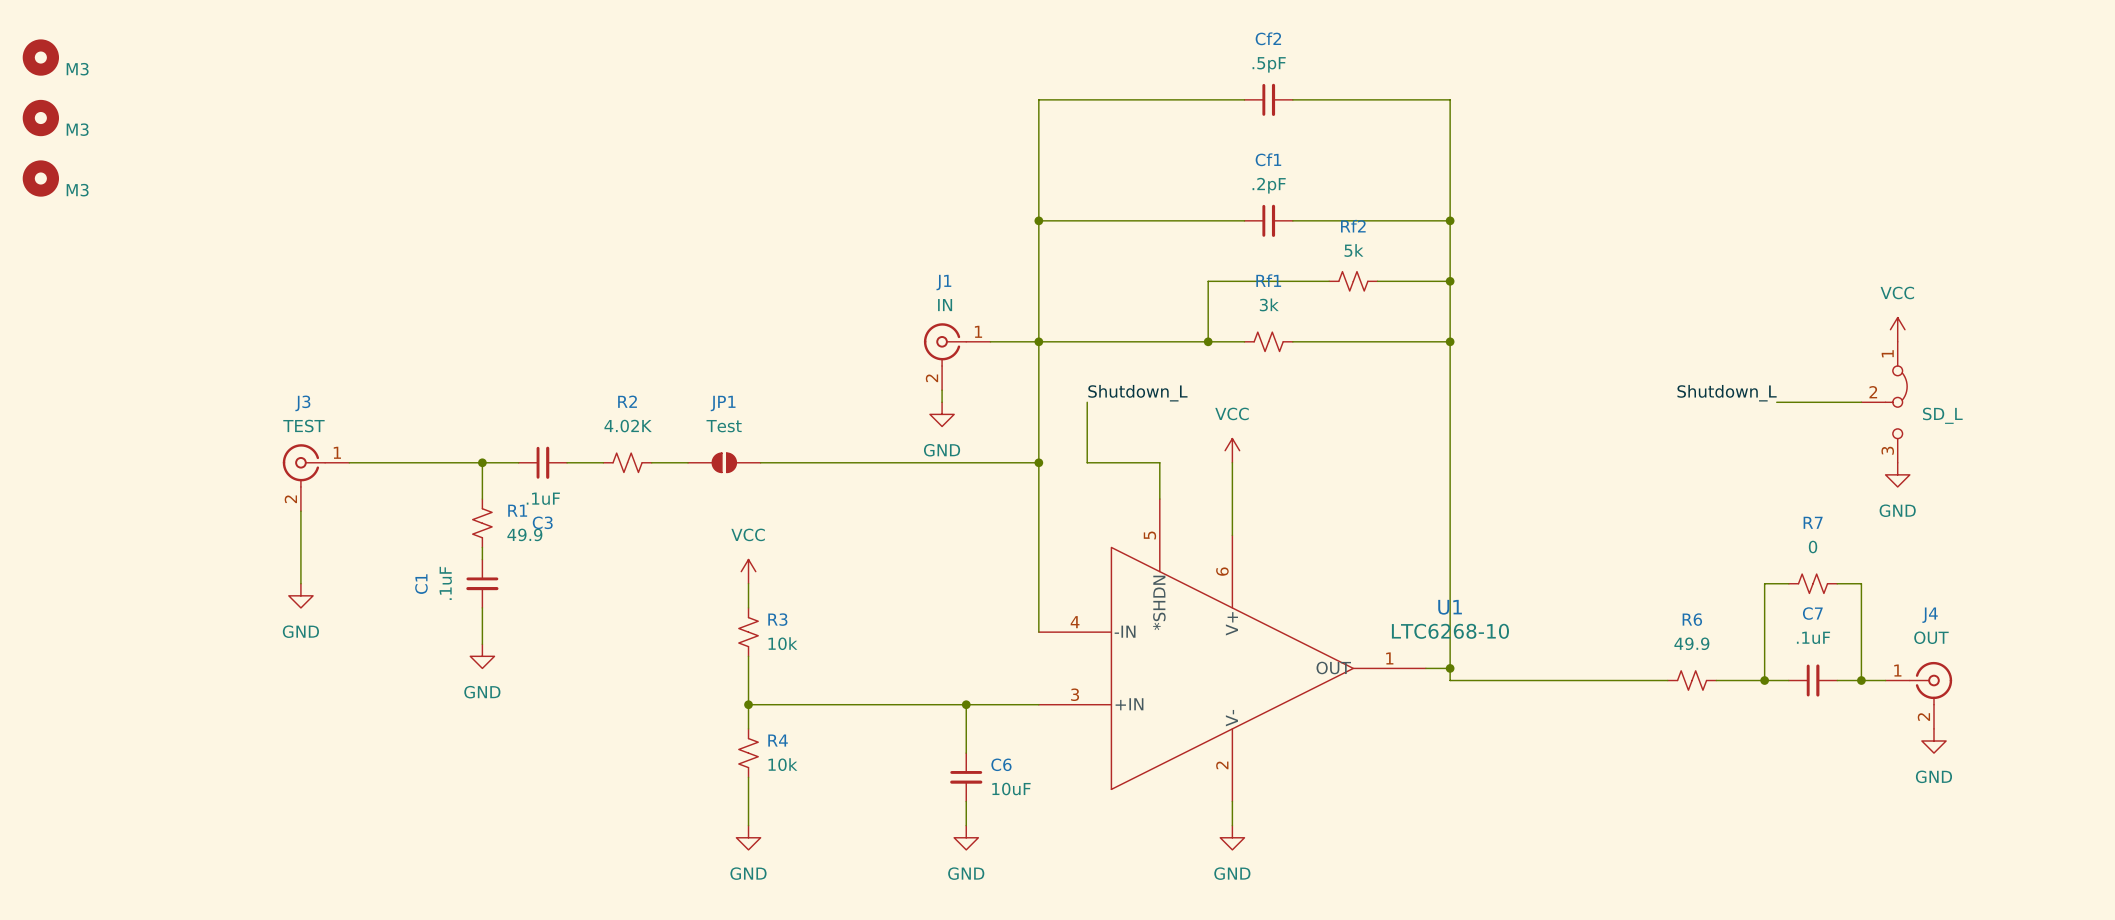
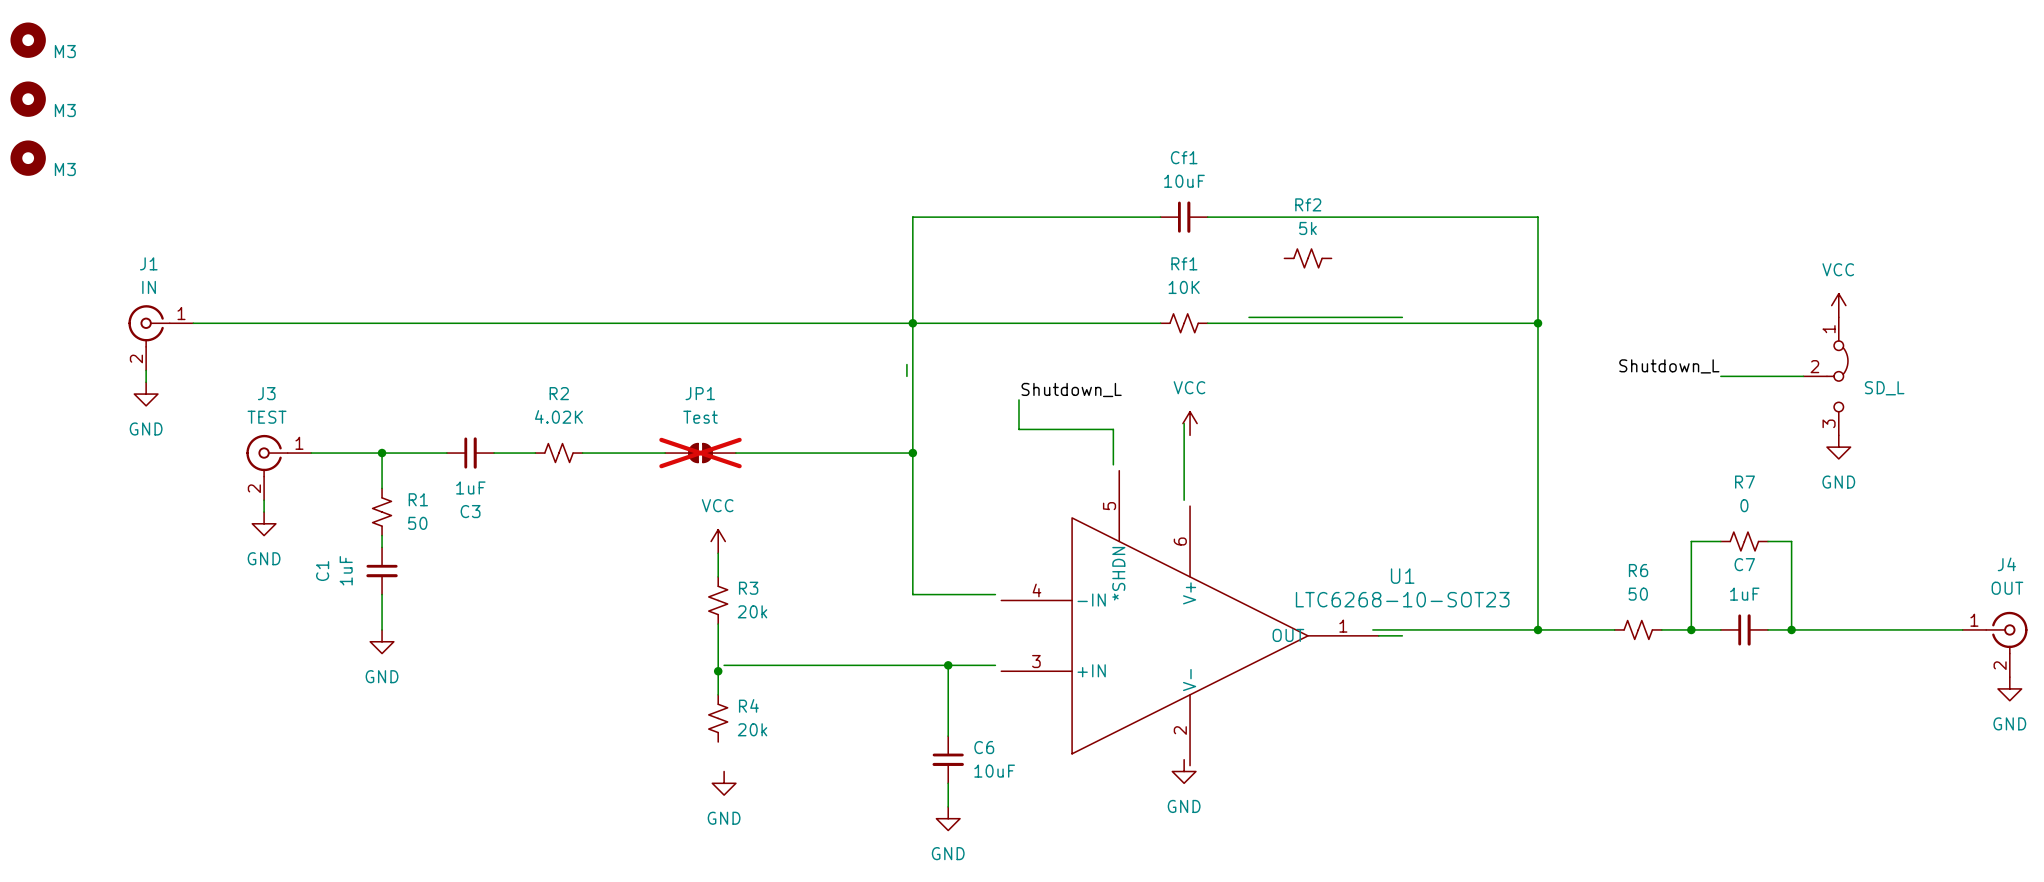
wire: (1244, 99) (1038, 99) (1038, 632) -> none
Cf2: .5pF (1268, 99) -> none
wire: (1292, 99) (1450, 99) (1450, 680) (1667, 680) -> none
Cf1 value: .2pF (1269, 185) -> 10uF (1184, 181)
wire: (1038, 220) (1244, 220) -> none
junction: (1038, 220) -> none
Cf1 position: (1268, 220) -> (1184, 217)
wire: (1292, 220) (1450, 220) -> none
junction: (1450, 220) -> none
wire: none -> (1160, 217) (912, 217) (912, 594) (995, 594)
wire: none -> (1207, 217) (1537, 217) (1537, 629)
wire: (1329, 281) (1208, 281) (1208, 341) -> none
wire: (1377, 281) (1450, 281) -> none
junction: (1450, 281) -> none
Rf1 value: 3k (1269, 304) -> 10K (1184, 287)
wire: (990, 341) (1244, 341) -> none
junction: (1038, 341) -> none
junction: (1208, 341) -> none
Rf1 position: (1268, 341) -> (1184, 323)
junction: (1450, 341) -> none
wire: none -> (193, 323) (1160, 323)
junction: none -> (912, 323)
wire: none -> (1207, 323) (1537, 323)
junction: none -> (1537, 323)
J1 position: (957, 356) -> (160, 337)
label position: Shutdown_L (1137, 393) -> Shutdown_L (1071, 389)
wire: none -> (146, 370) (146, 382)
wire: (1087, 402) (1087, 462) (1159, 462) (1159, 499) -> none
power symbol: GND (942, 414) -> none
power symbol: none -> GND (146, 394)
wire: none -> (1018, 399) (1018, 429) (1113, 429) (1113, 464)
wire: none -> (1184, 423) (1184, 500)
wire: (349, 462) (518, 462) -> none
wire: (482, 462) (482, 499) -> (382, 453) (382, 488)
junction: (482, 462) -> none
C3 position: (542, 462) -> (470, 453)
wire: (567, 462) (603, 462) -> none
R2 position: (627, 462) -> (558, 453)
wire: (651, 462) (688, 462) -> none
JP1 position: (724, 462) -> (700, 453)
wire: (760, 462) (1038, 462) -> (724, 665) (995, 665)
junction: (1038, 462) -> none
wire: (1232, 462) (1232, 535) -> none
J3 position: (316, 477) -> (278, 467)
wire: none -> (311, 453) (446, 453)
junction: none -> (382, 453)
wire: none -> (494, 453) (535, 453)
wire: none -> (582, 453) (665, 453)
JP1 do-not-place cross: none -> (700, 453)
wire: none -> (735, 453) (912, 453)
junction: none -> (912, 453)
C3 value: .1uF (543, 498) -> 1uF (470, 487)
wire: (300, 511) (300, 583) -> none
R1 position: (482, 523) -> (382, 512)
wire: none -> (264, 500) (264, 512)
R1 value: 49.9 (524, 534) -> 50 (417, 523)
wire: (482, 547) (482, 559) -> (382, 535) (382, 547)
wire: none -> (1720, 541) (1691, 541) (1691, 629)
wire: none -> (1768, 541) (1791, 541) (1791, 629)
C1 value: .1uF (445, 583) -> 1uF (346, 570)
C1 position: (482, 583) -> (382, 570)
wire: (1788, 583) (1764, 583) (1764, 680) -> none
R7 position: (1813, 583) -> (1744, 541)
wire: (1837, 583) (1861, 583) (1861, 680) -> none
power symbol position: GND (300, 595) -> GND (264, 523)
wire: (482, 607) (482, 644) -> (382, 594) (382, 629)
U1 value: LTC6268-10 (1450, 631) -> LTC6268-10-SOT23 (1402, 599)
C7 value: .1uF (1813, 637) -> 1uF (1744, 594)
R3 value: 10k (782, 643) -> 20k (752, 611)
R6 value: 49.9 (1691, 643) -> 50 (1638, 594)
power symbol: GND (482, 656) -> none
wire: none -> (1372, 629) (1614, 629)
junction: none -> (1537, 629)
wire: none -> (1661, 629) (1720, 629)
wire: none -> (1768, 629) (1962, 629)
junction: (1450, 668) -> none
power symbol: none -> GND (382, 641)
R6 position: (1692, 680) -> (1638, 629)
wire: (1716, 680) (1788, 680) -> none
junction position: (1764, 680) -> (1691, 629)
C7 position: (1813, 680) -> (1744, 629)
wire: (1837, 680) (1885, 680) -> none
junction position: (1861, 680) -> (1791, 629)
J4 position: (1918, 695) -> (1995, 644)
wire: none -> (948, 665) (948, 736)
wire: (748, 704) (1038, 704) -> none
wire: (966, 704) (966, 753) -> none
junction position: (966, 704) -> (948, 665)
power symbol position: GND (1933, 741) -> GND (2009, 688)
R4 value: 10k (782, 764) -> 20k (752, 729)
wire: (748, 777) (748, 825) -> none
C6 position: (966, 777) -> (948, 759)
wire: (966, 801) (966, 825) -> (948, 783) (948, 806)
wire: (1232, 801) (1232, 825) -> none
power symbol position: GND (748, 837) -> GND (724, 783)
power symbol position: GND (966, 837) -> GND (948, 818)
power symbol position: GND (1232, 837) -> GND (1184, 771)

